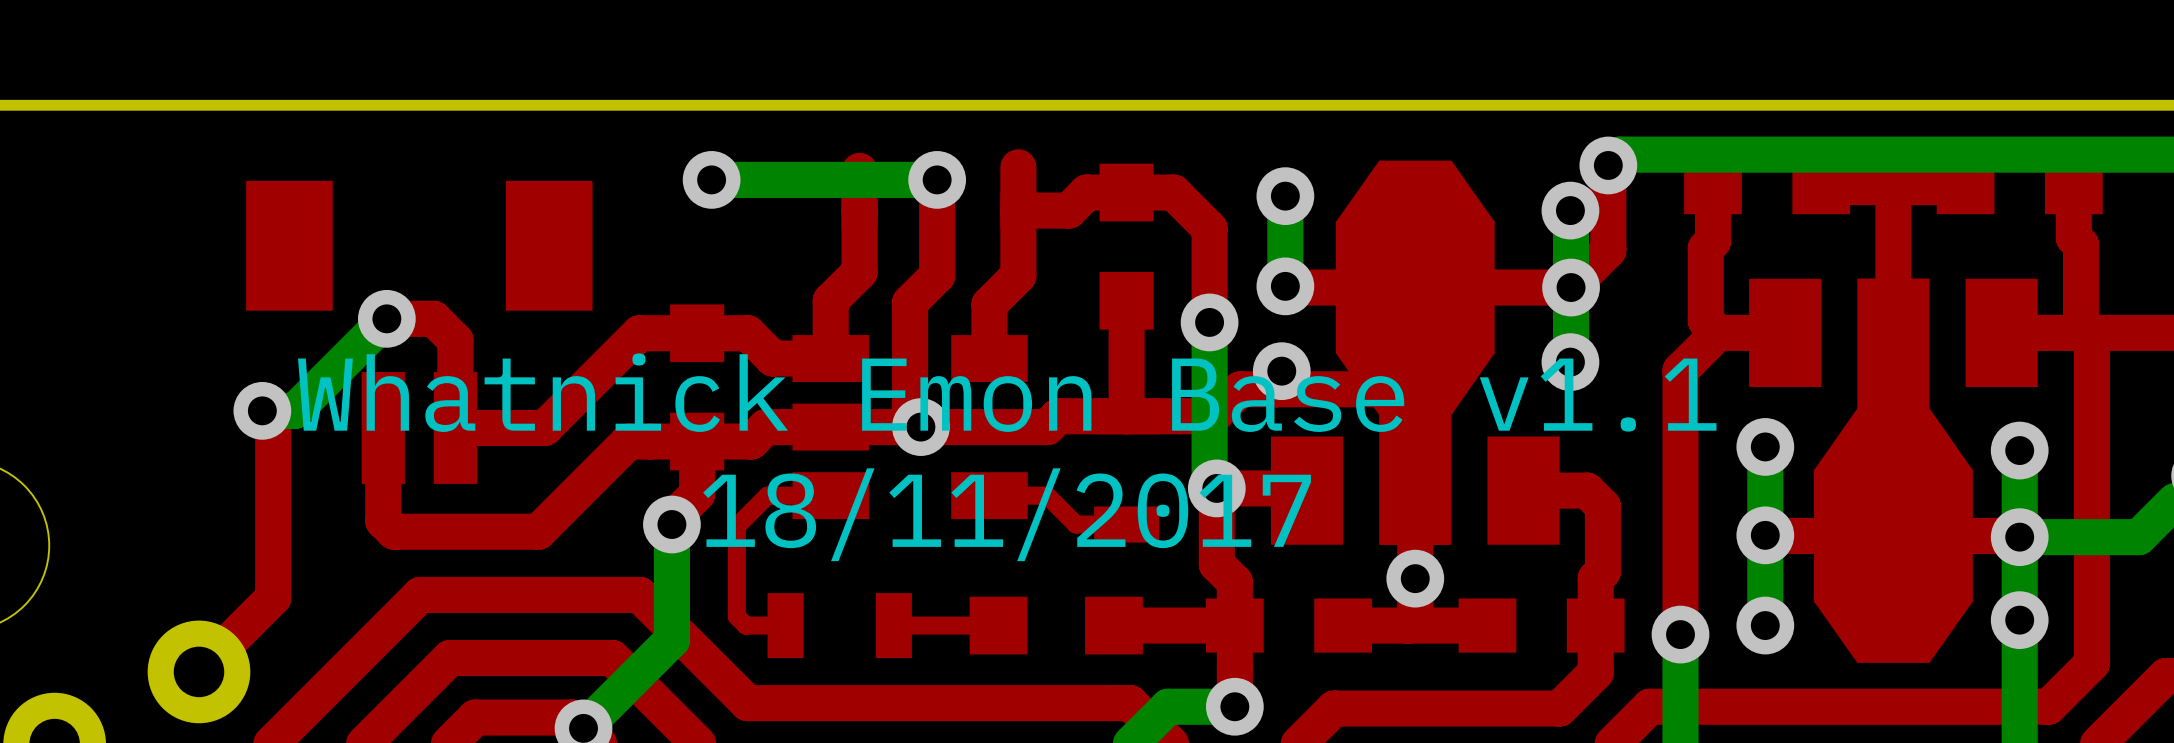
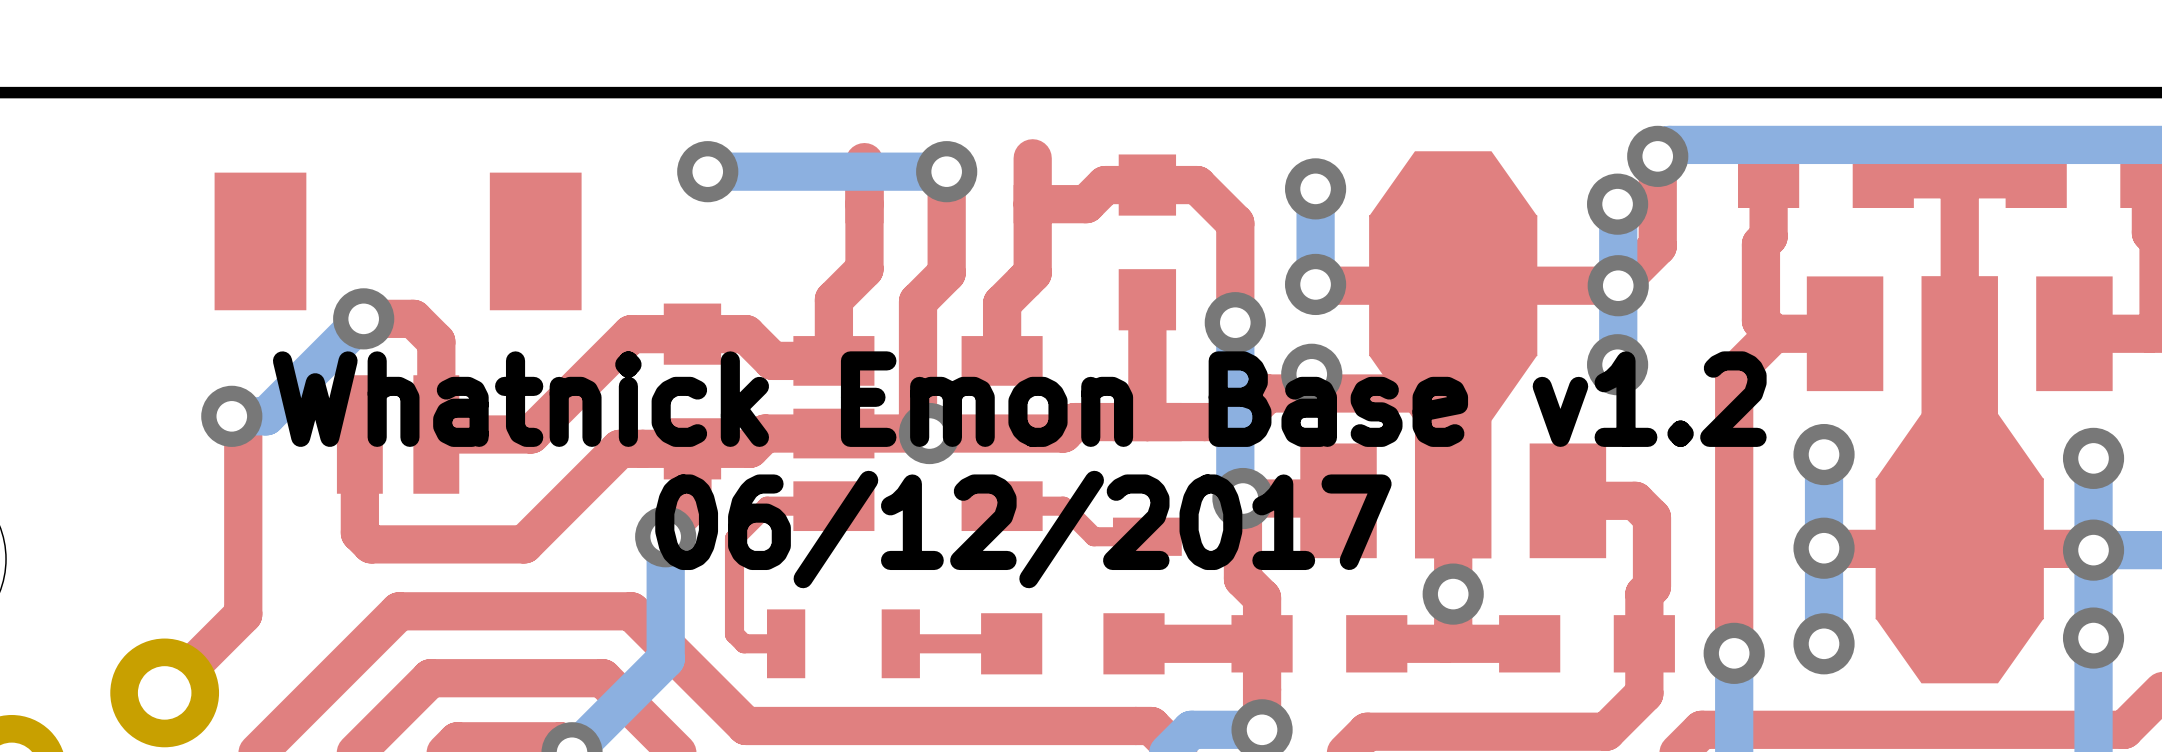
text: Whatnick Emon Base v1.1 (1007, 392) -> Whatnick Emon Base v1.2 (1019, 399)
text: 18/11/2017 (1007, 514) -> 06/12/2017 (1023, 529)

